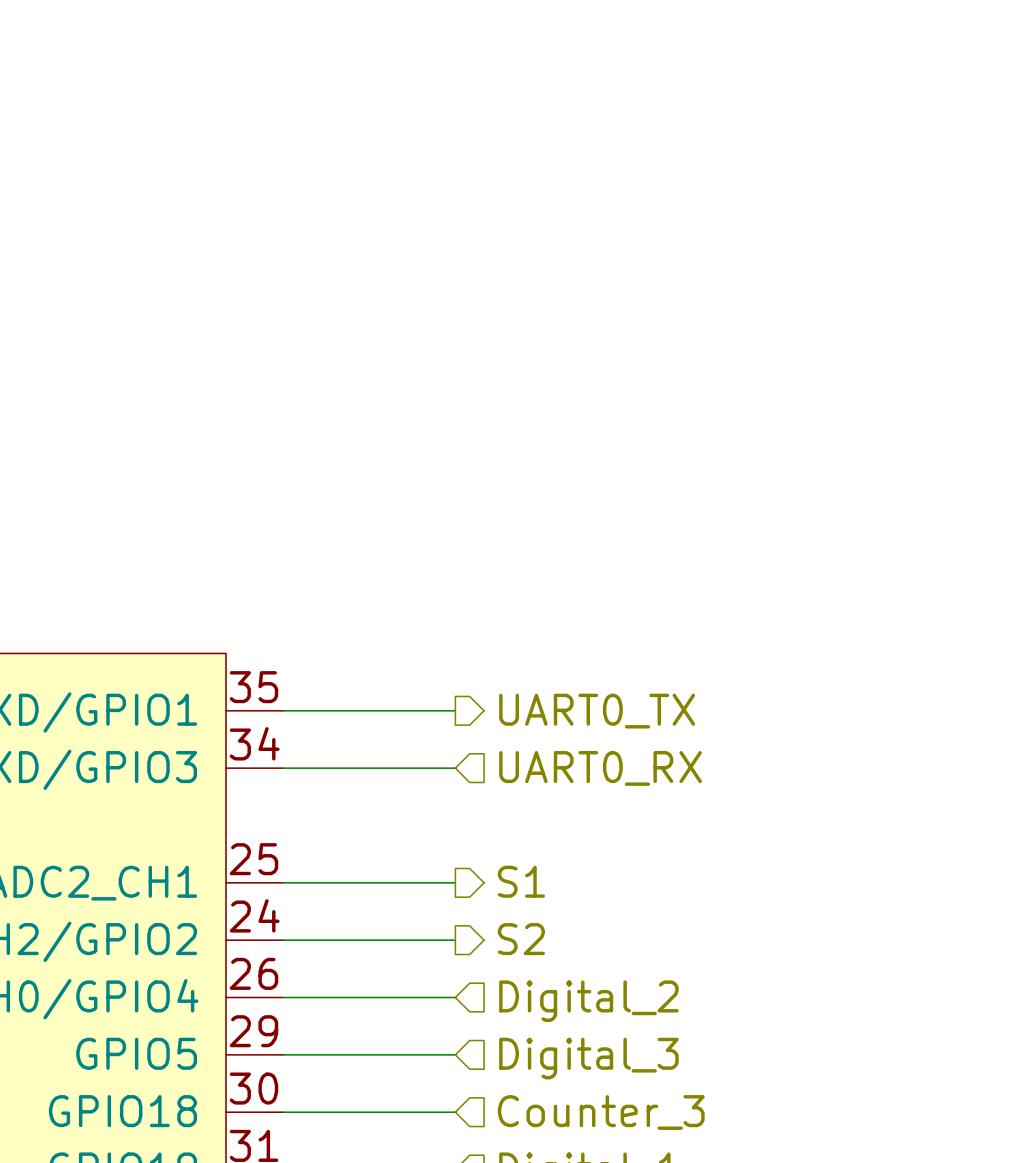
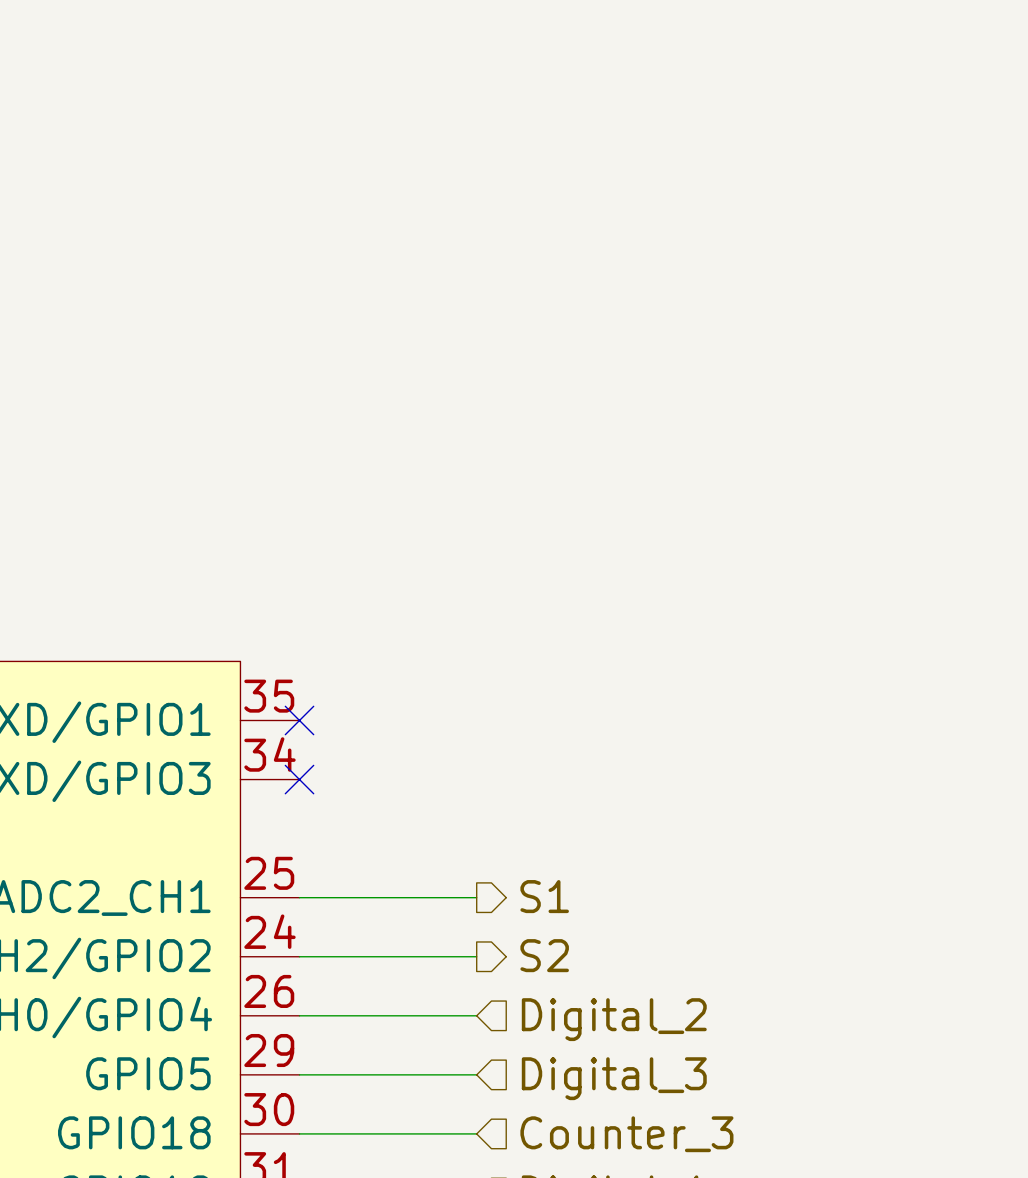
wire: (283, 710) (455, 710) -> none
no-connect mark: none -> (299, 720)
hierarchical label: UART0_TX (597, 711) -> none
wire: (283, 768) (455, 768) -> none
no-connect mark: none -> (299, 779)
hierarchical label: UART0_RX (600, 768) -> none

